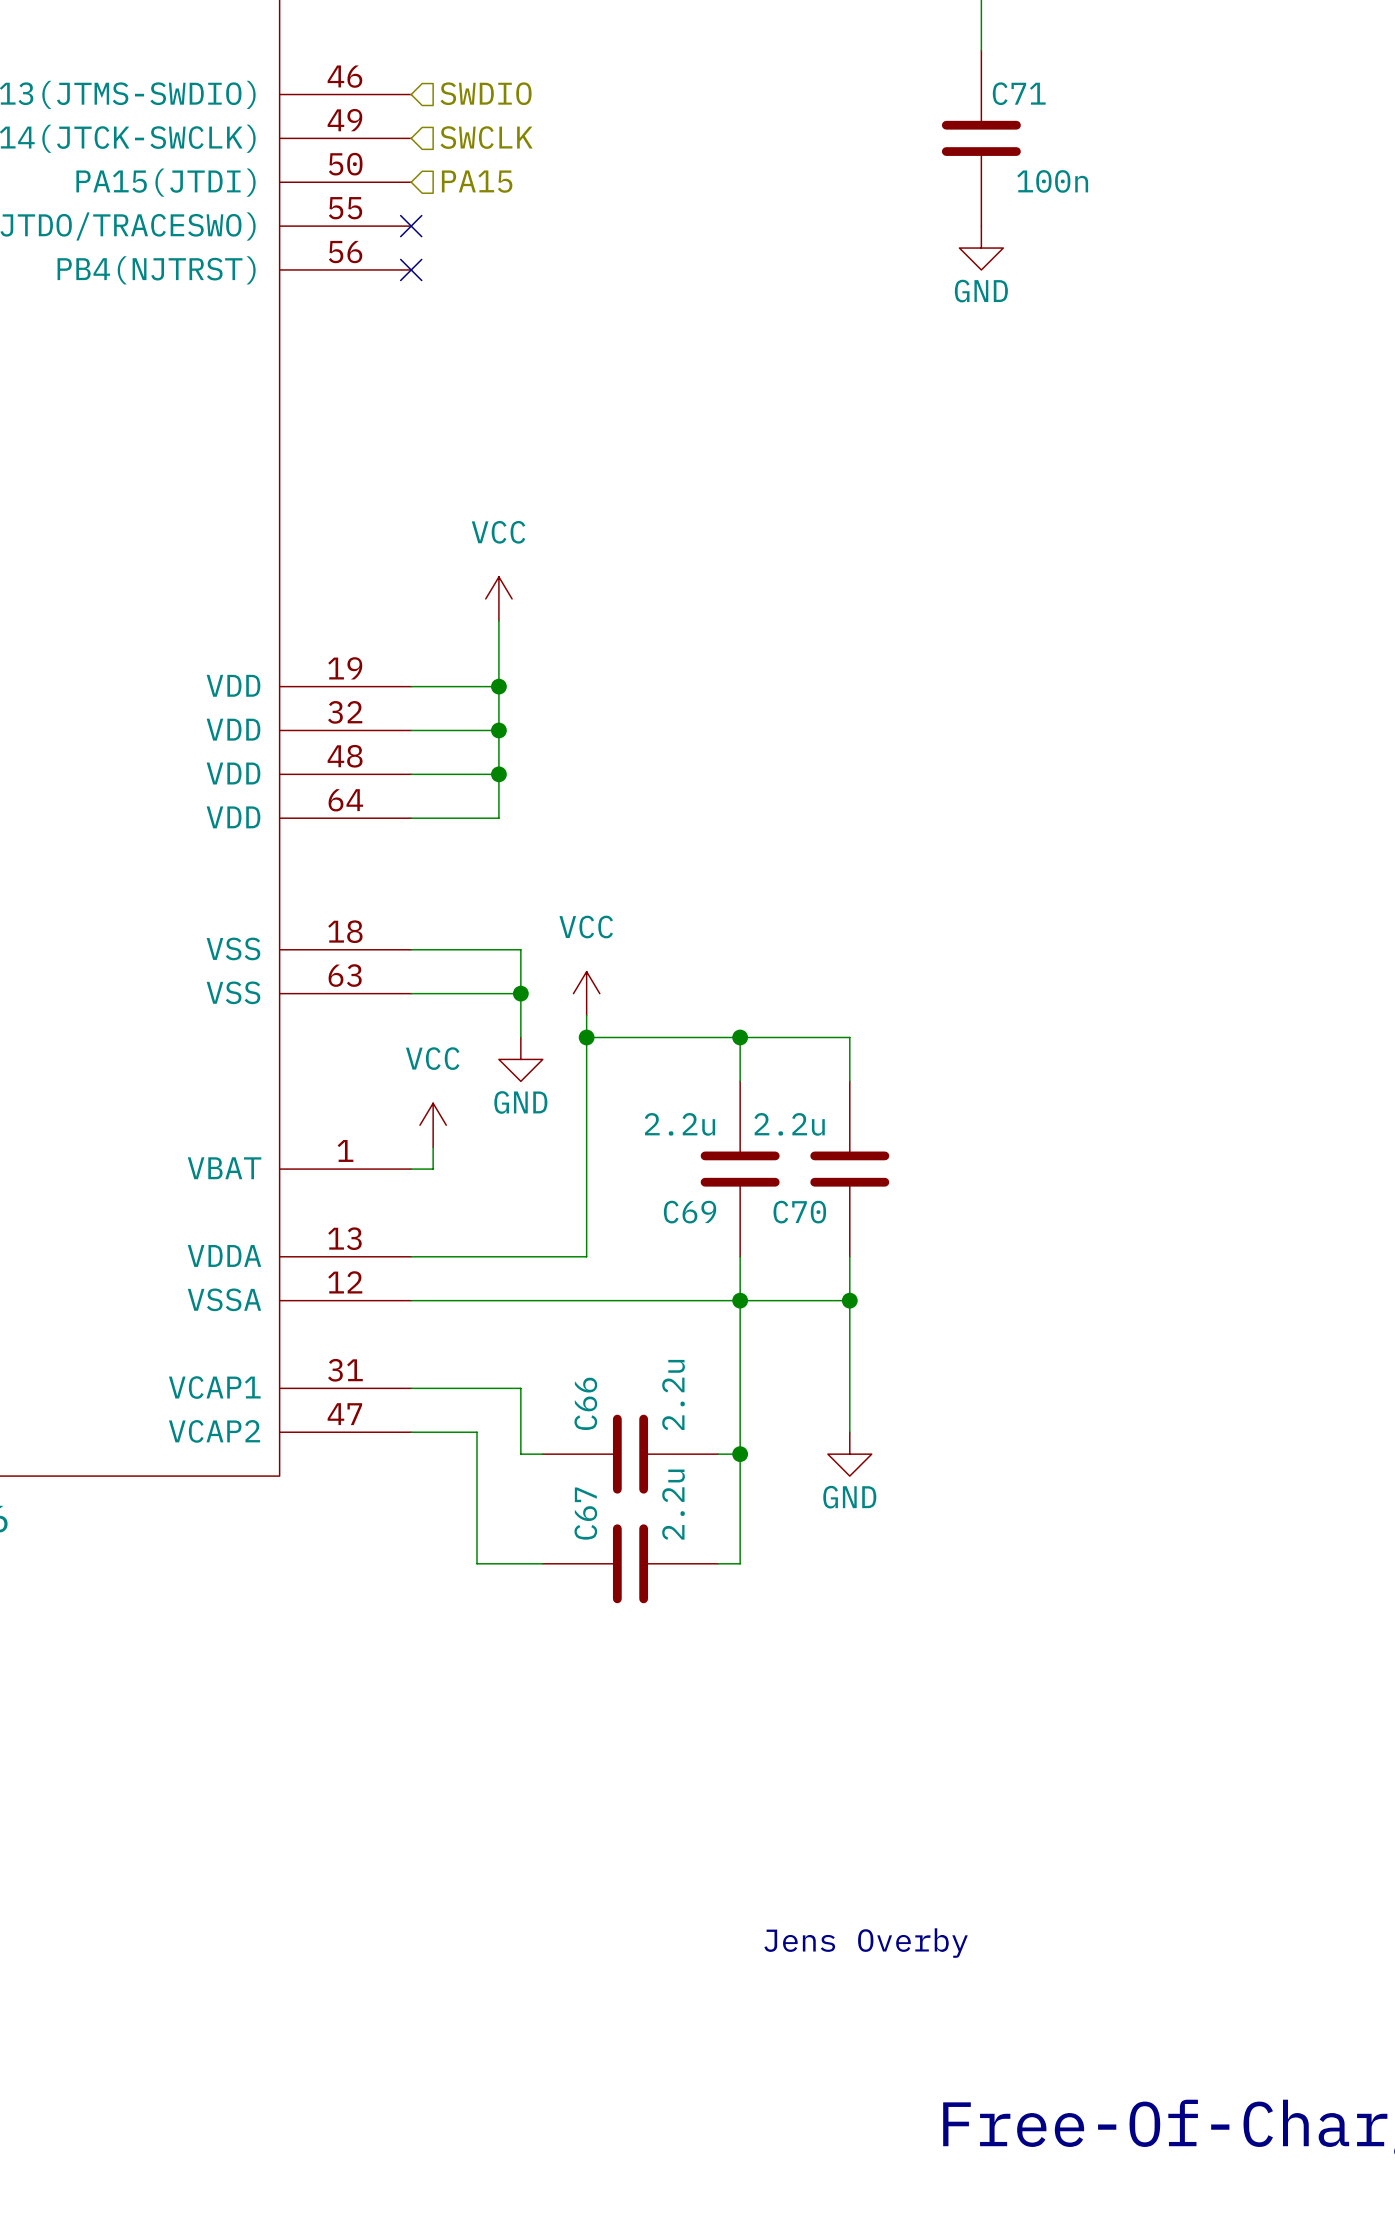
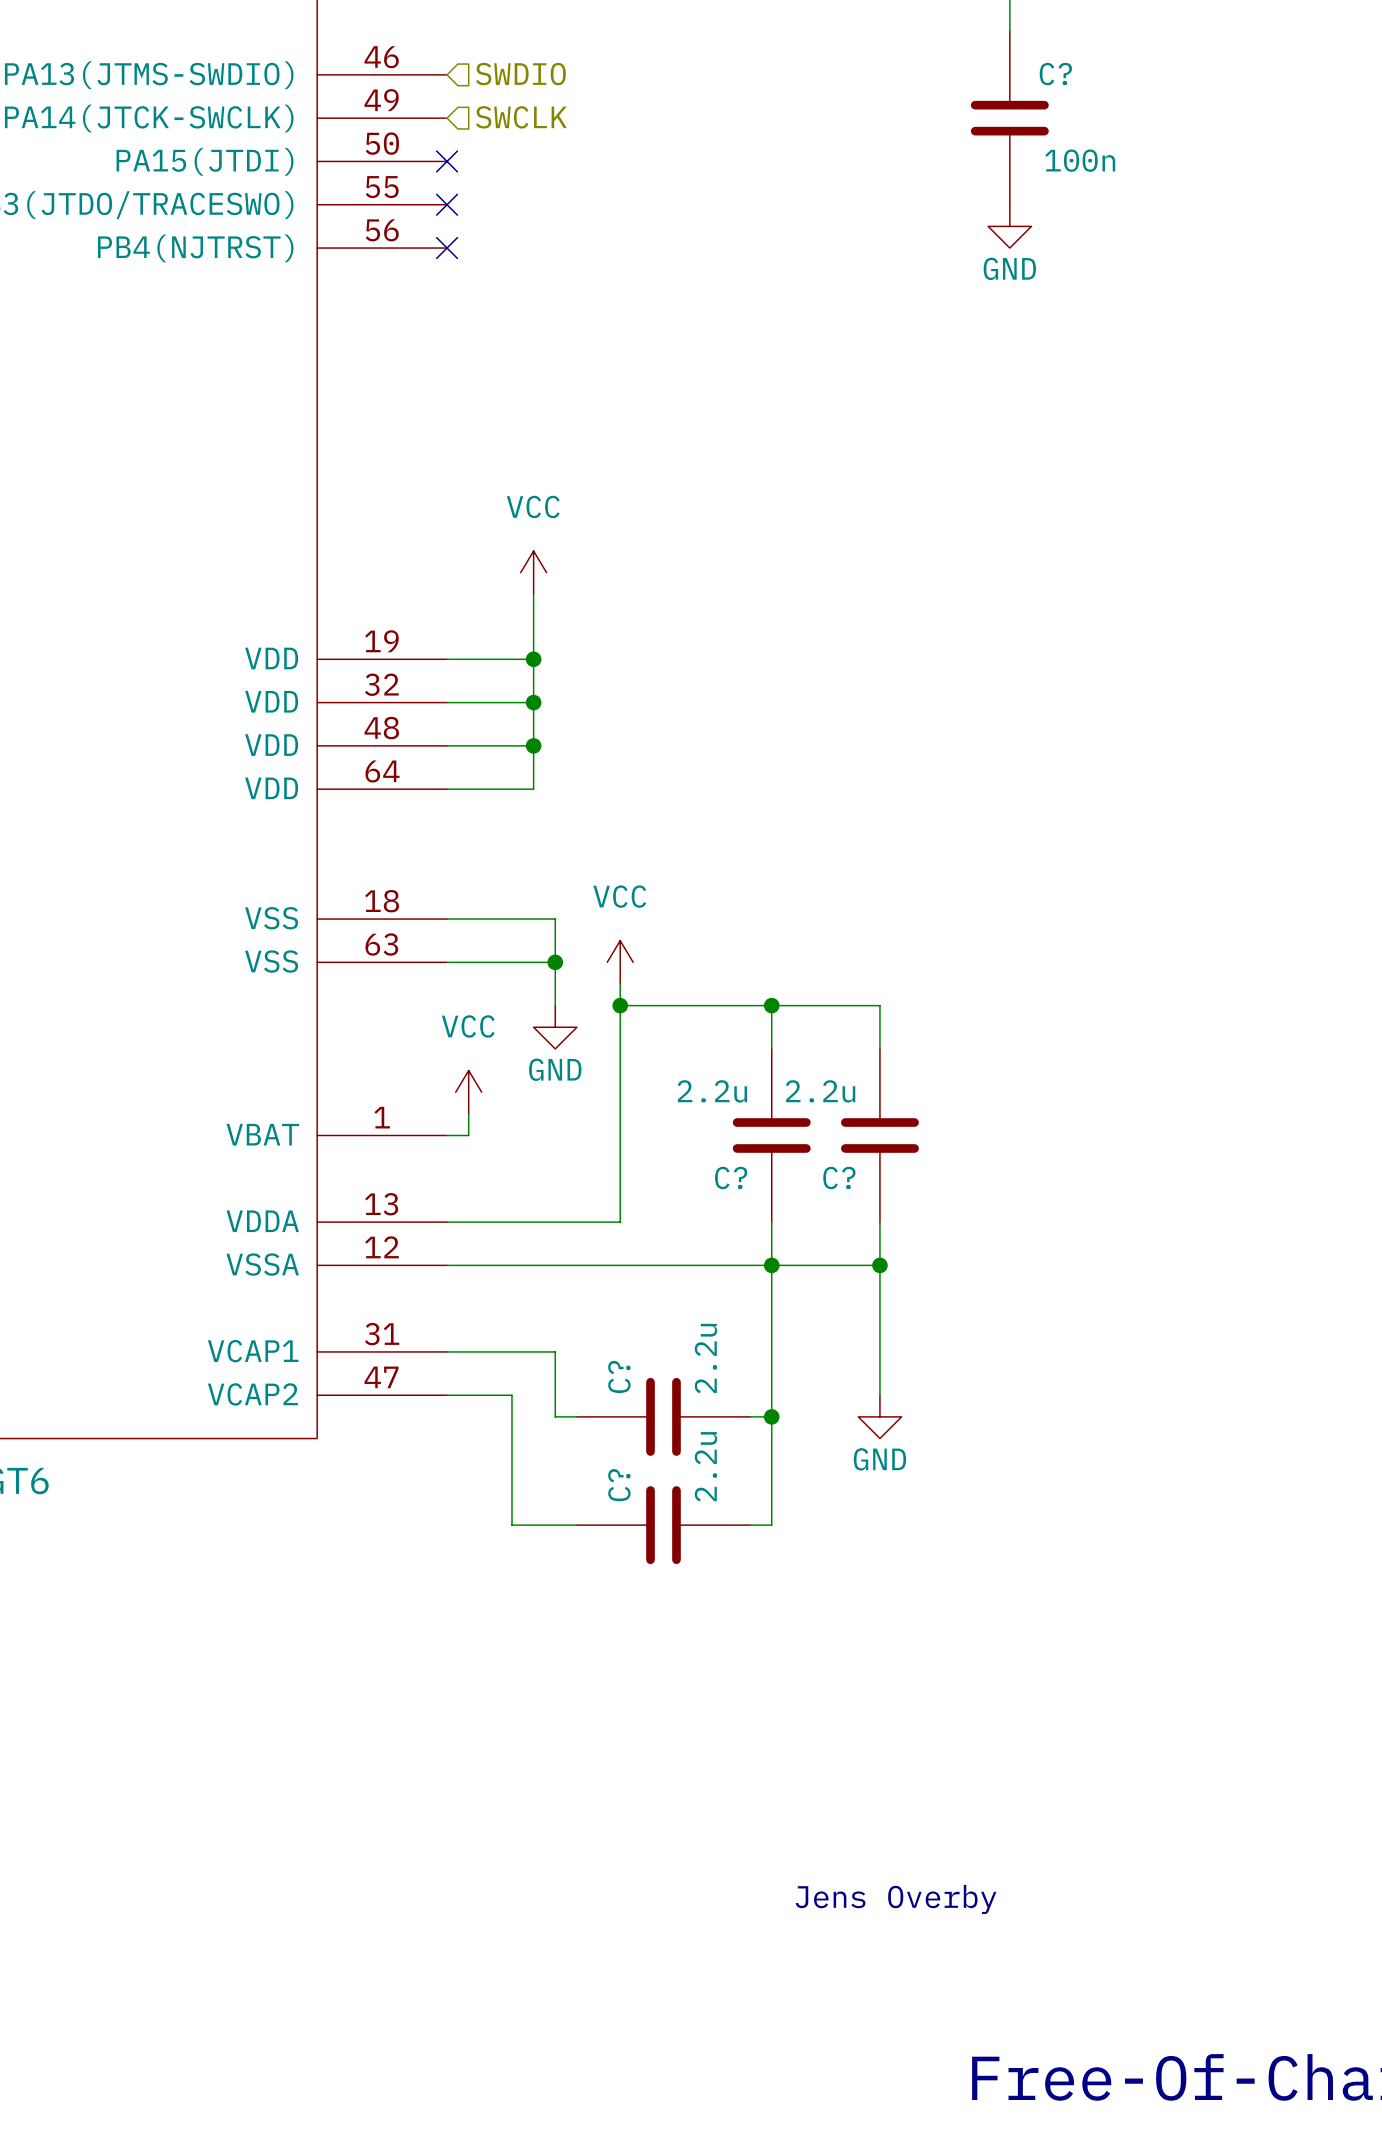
C71 name: C71 (1019, 93) -> C? (1055, 74)
hierarchical label: PA15 (477, 181) -> none
no-connect mark: none -> (447, 161)
C69 name: C69 (690, 1212) -> C? (731, 1177)
C70 name: C70 (799, 1212) -> C? (839, 1177)
C66 name: C66 (585, 1403) -> C? (619, 1376)
C67 name: C67 (585, 1513) -> C? (619, 1485)

